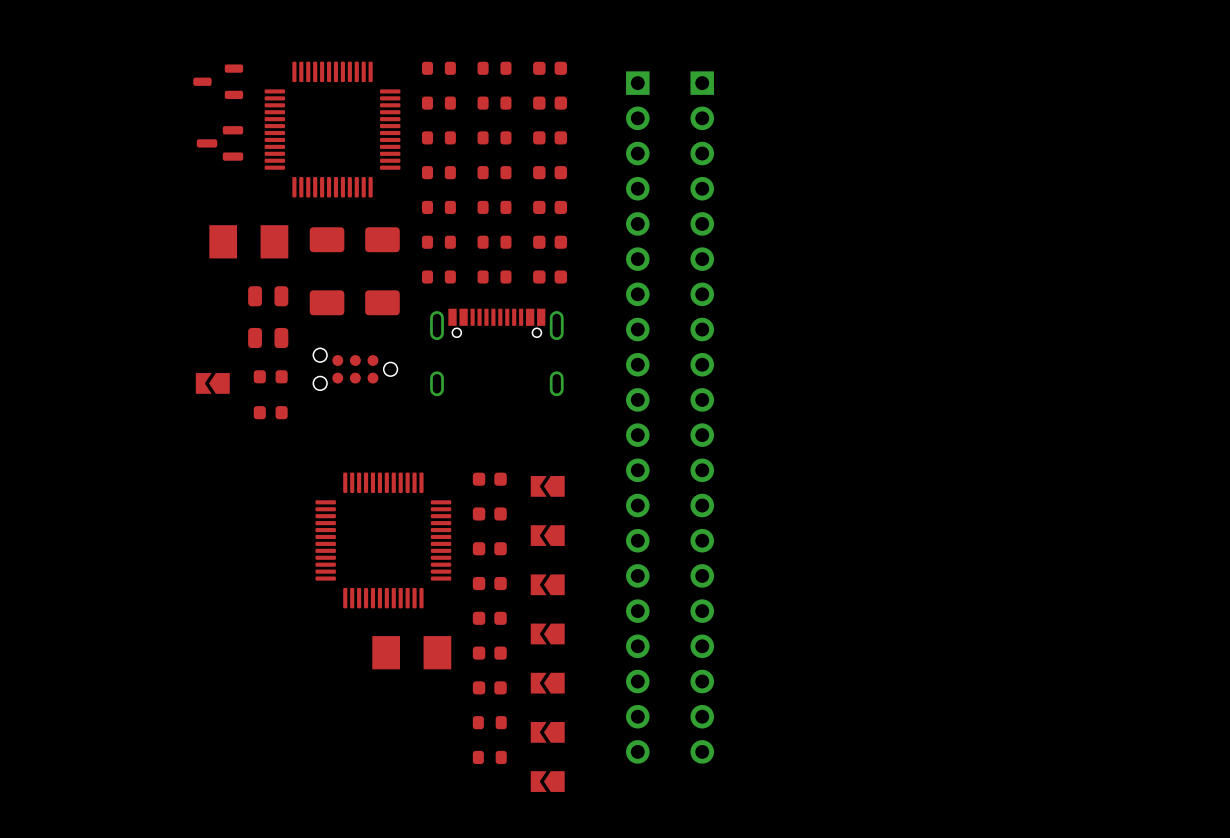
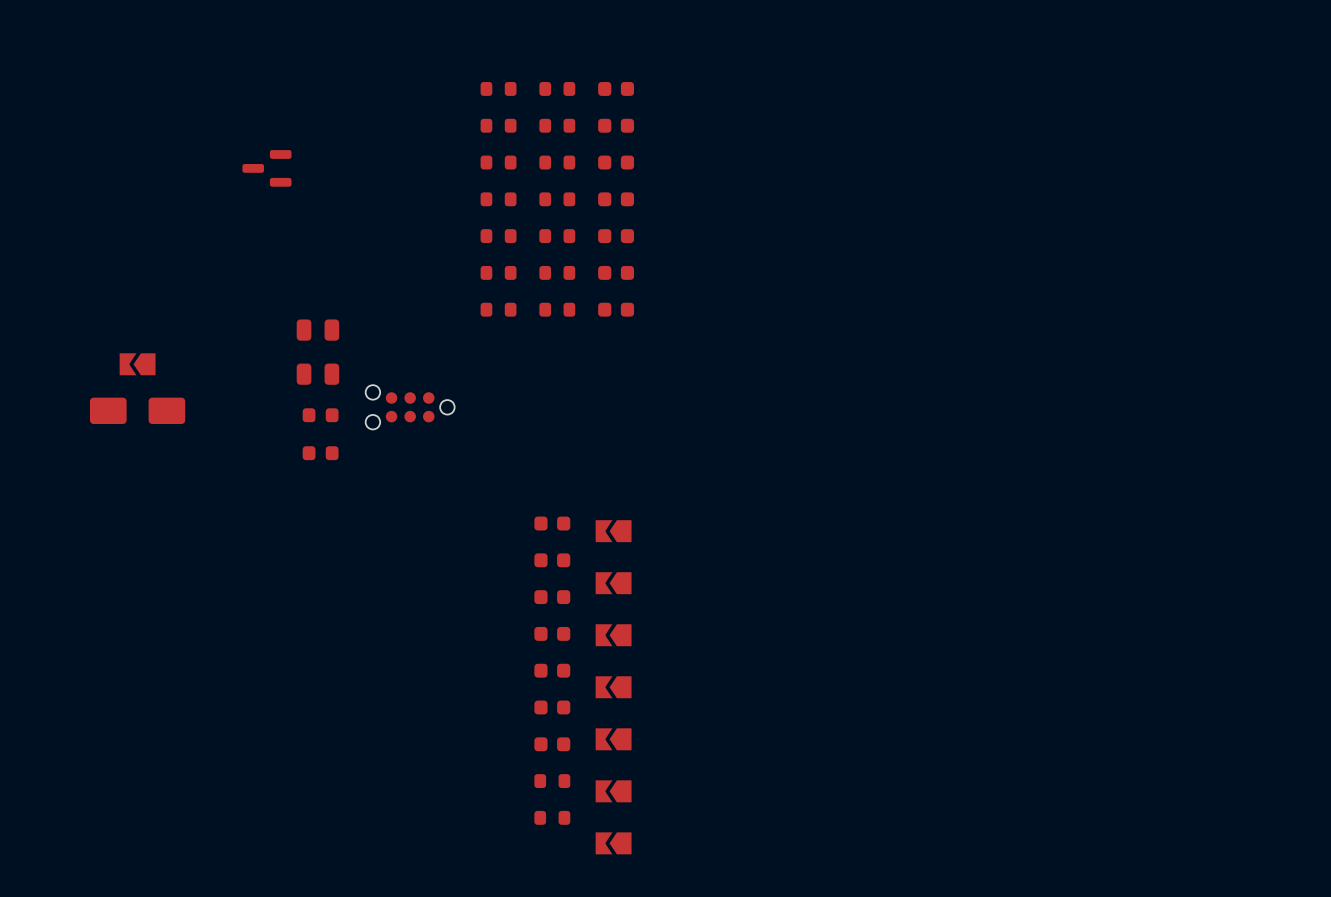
part: (218, 81) -> none
part: (332, 129) -> none
part: (354, 239) -> none
part: (248, 241) -> none
part: (354, 302) -> none
part: (496, 352) -> none
part: none -> (137, 410)
part position: (212, 383) -> (137, 364)
part: (637, 417) -> none
part: (702, 417) -> none
part: (383, 540) -> none
part: (411, 652) -> none

